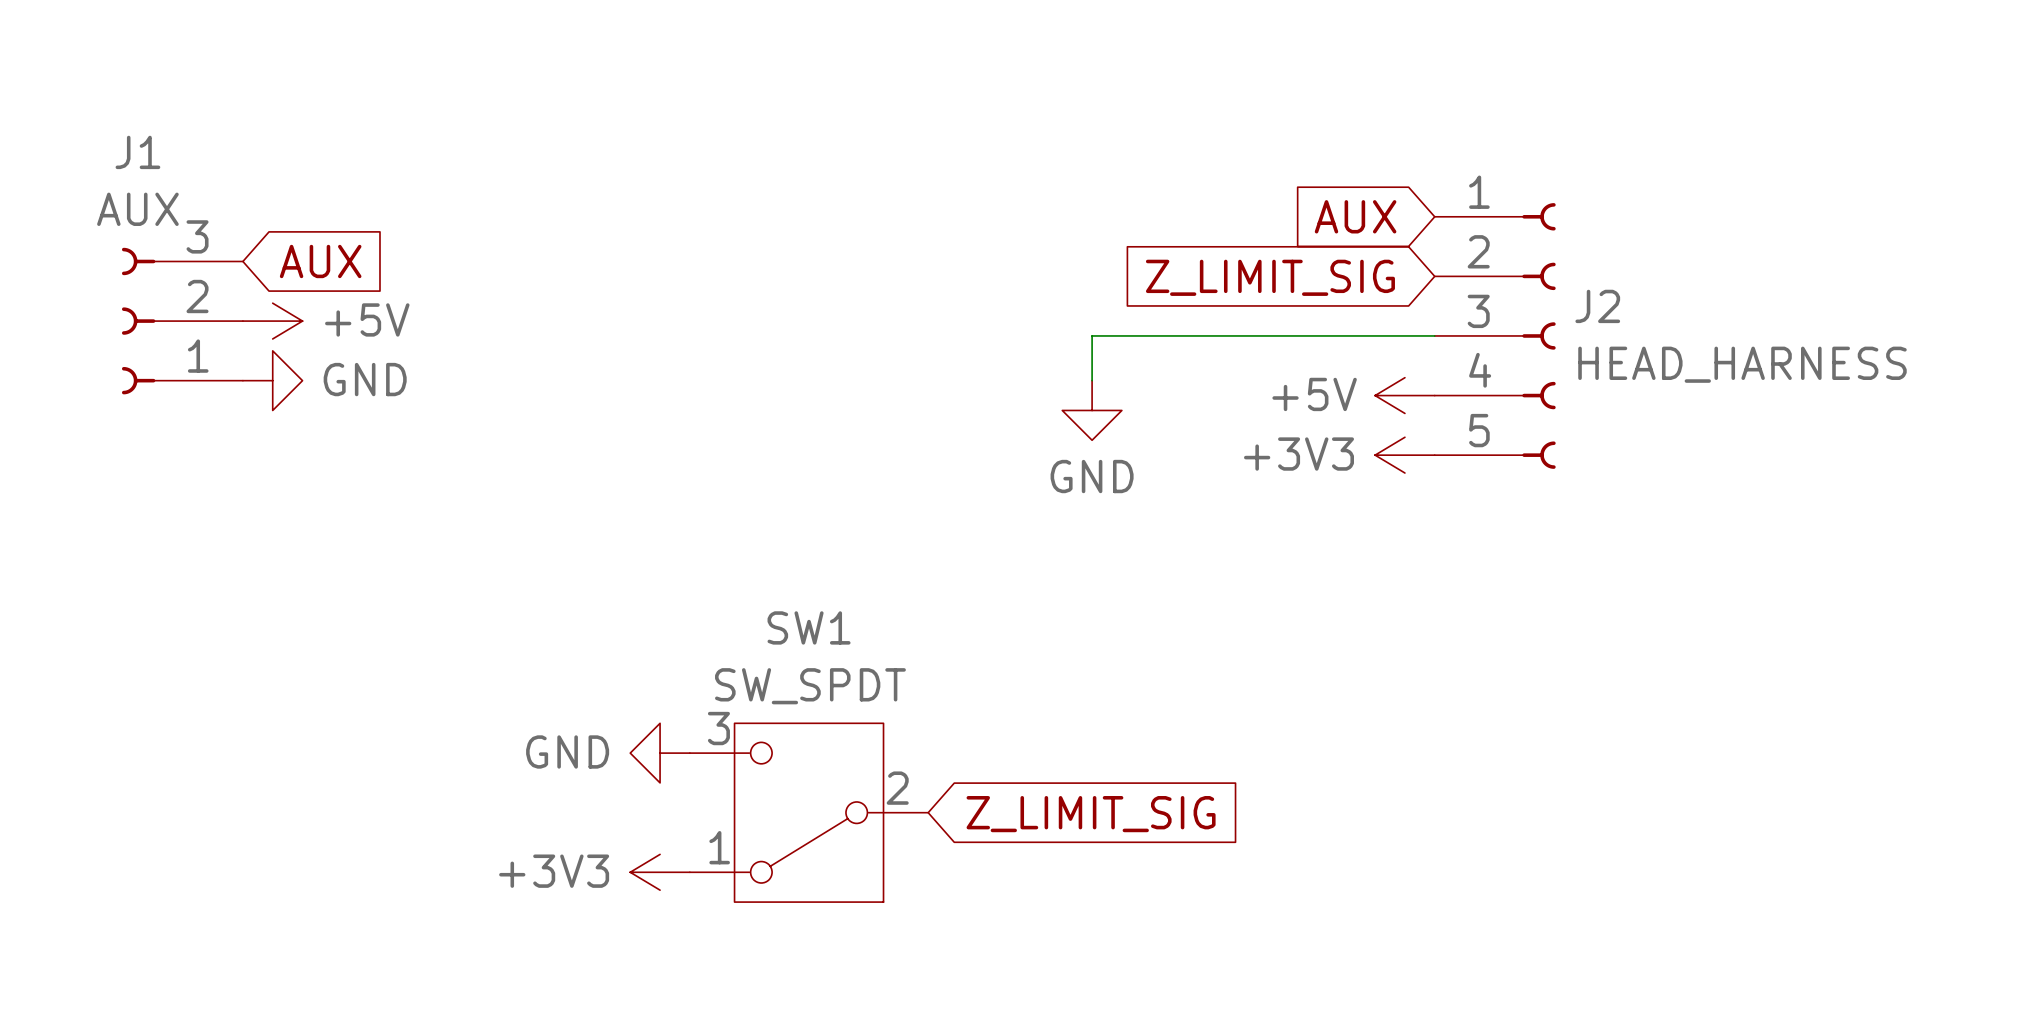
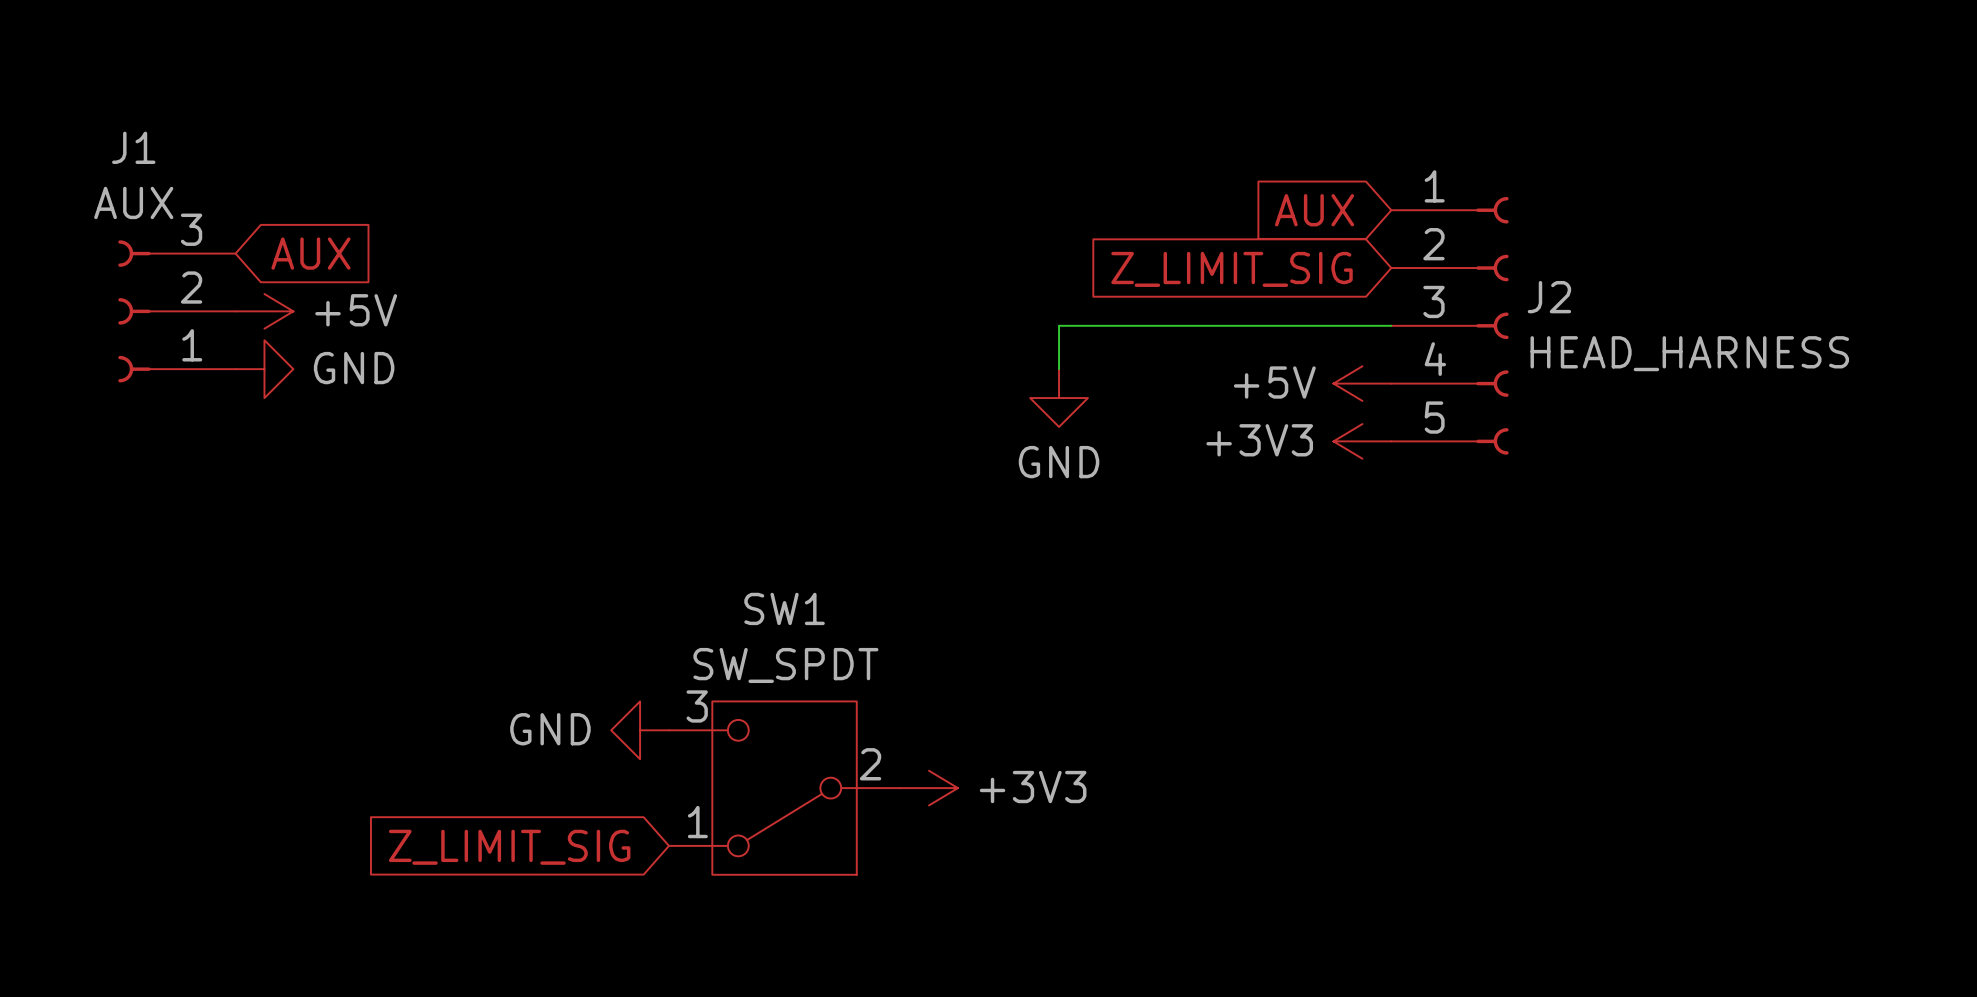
global label rotation: 0° (1091, 814) -> 180° (509, 847)
global label position: Z_LIMIT_SIG (1091, 814) -> Z_LIMIT_SIG (509, 847)
power symbol rotation: 0° (660, 872) -> 180° (929, 788)
power symbol position: +3V3 (660, 872) -> +3V3 (929, 788)

